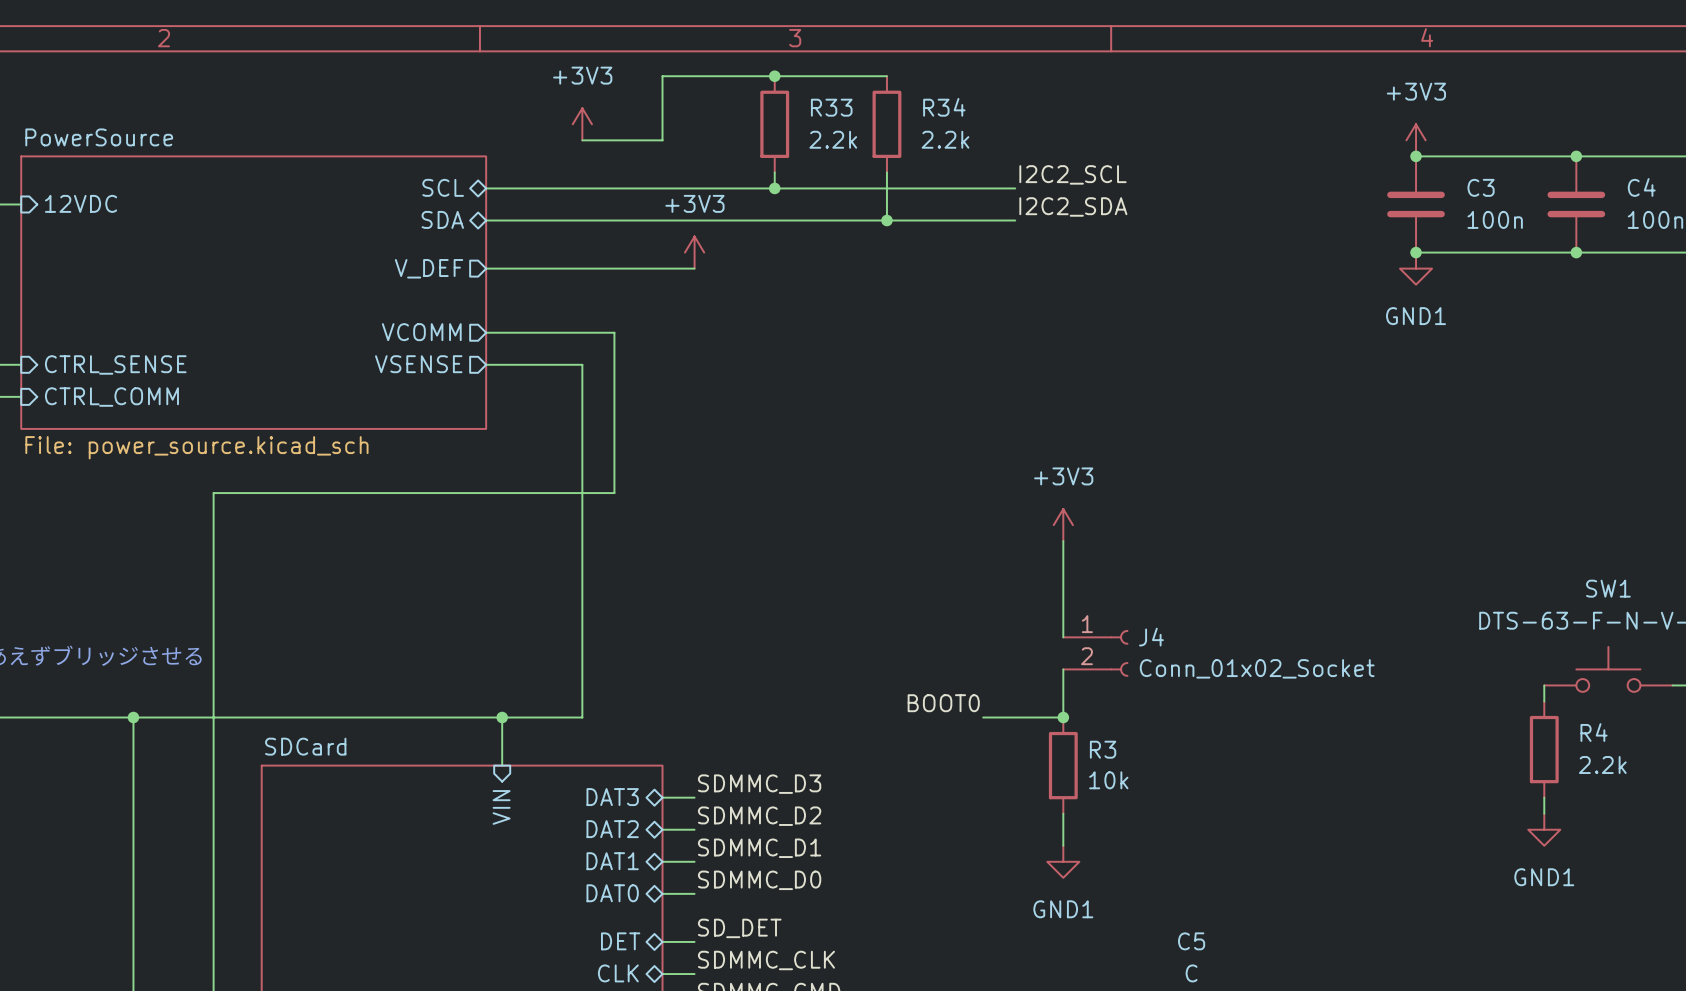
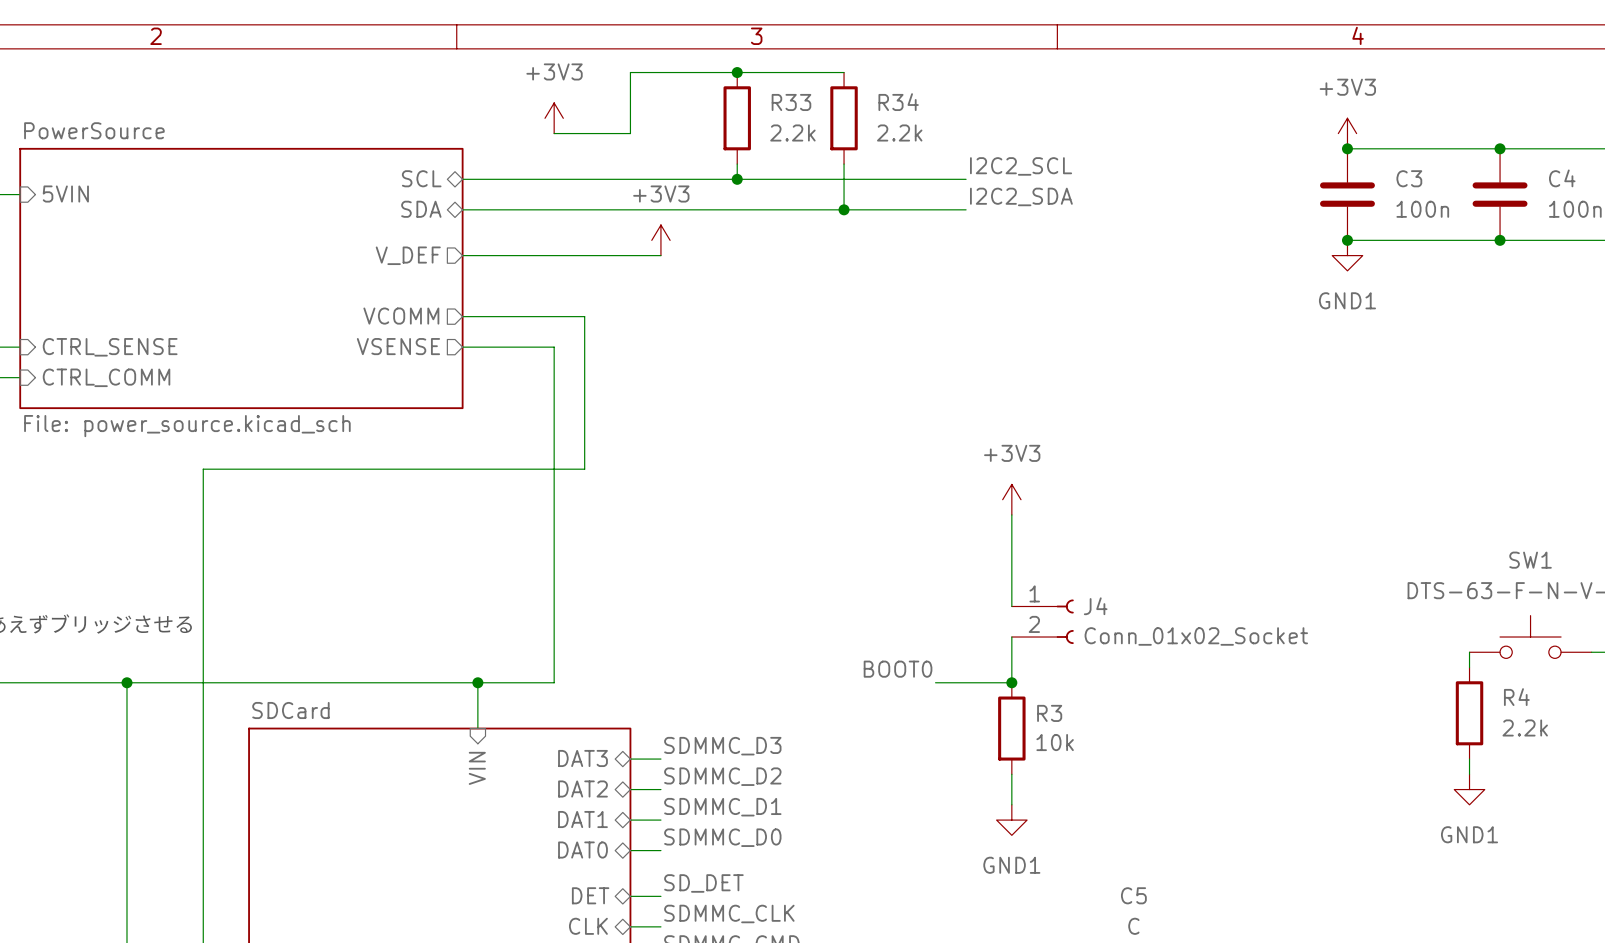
sheet pin: 12VDC (81, 203) -> 5VIN (65, 194)

